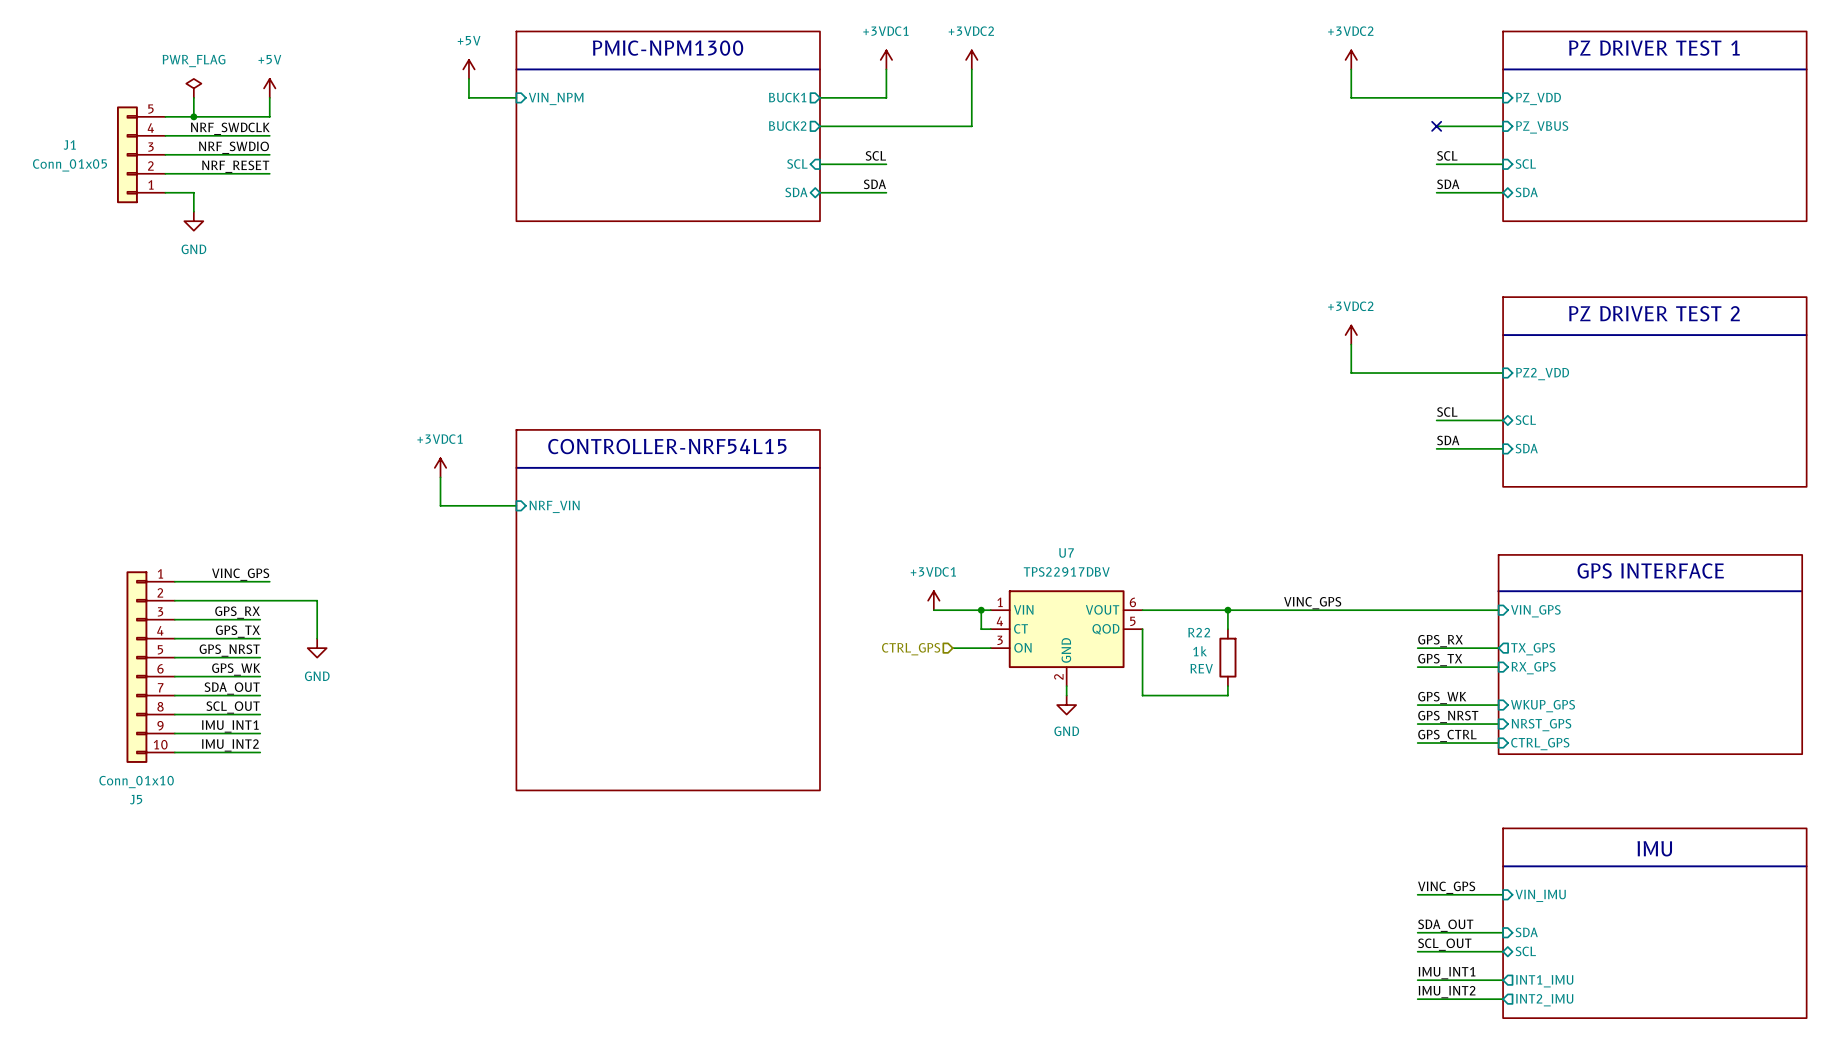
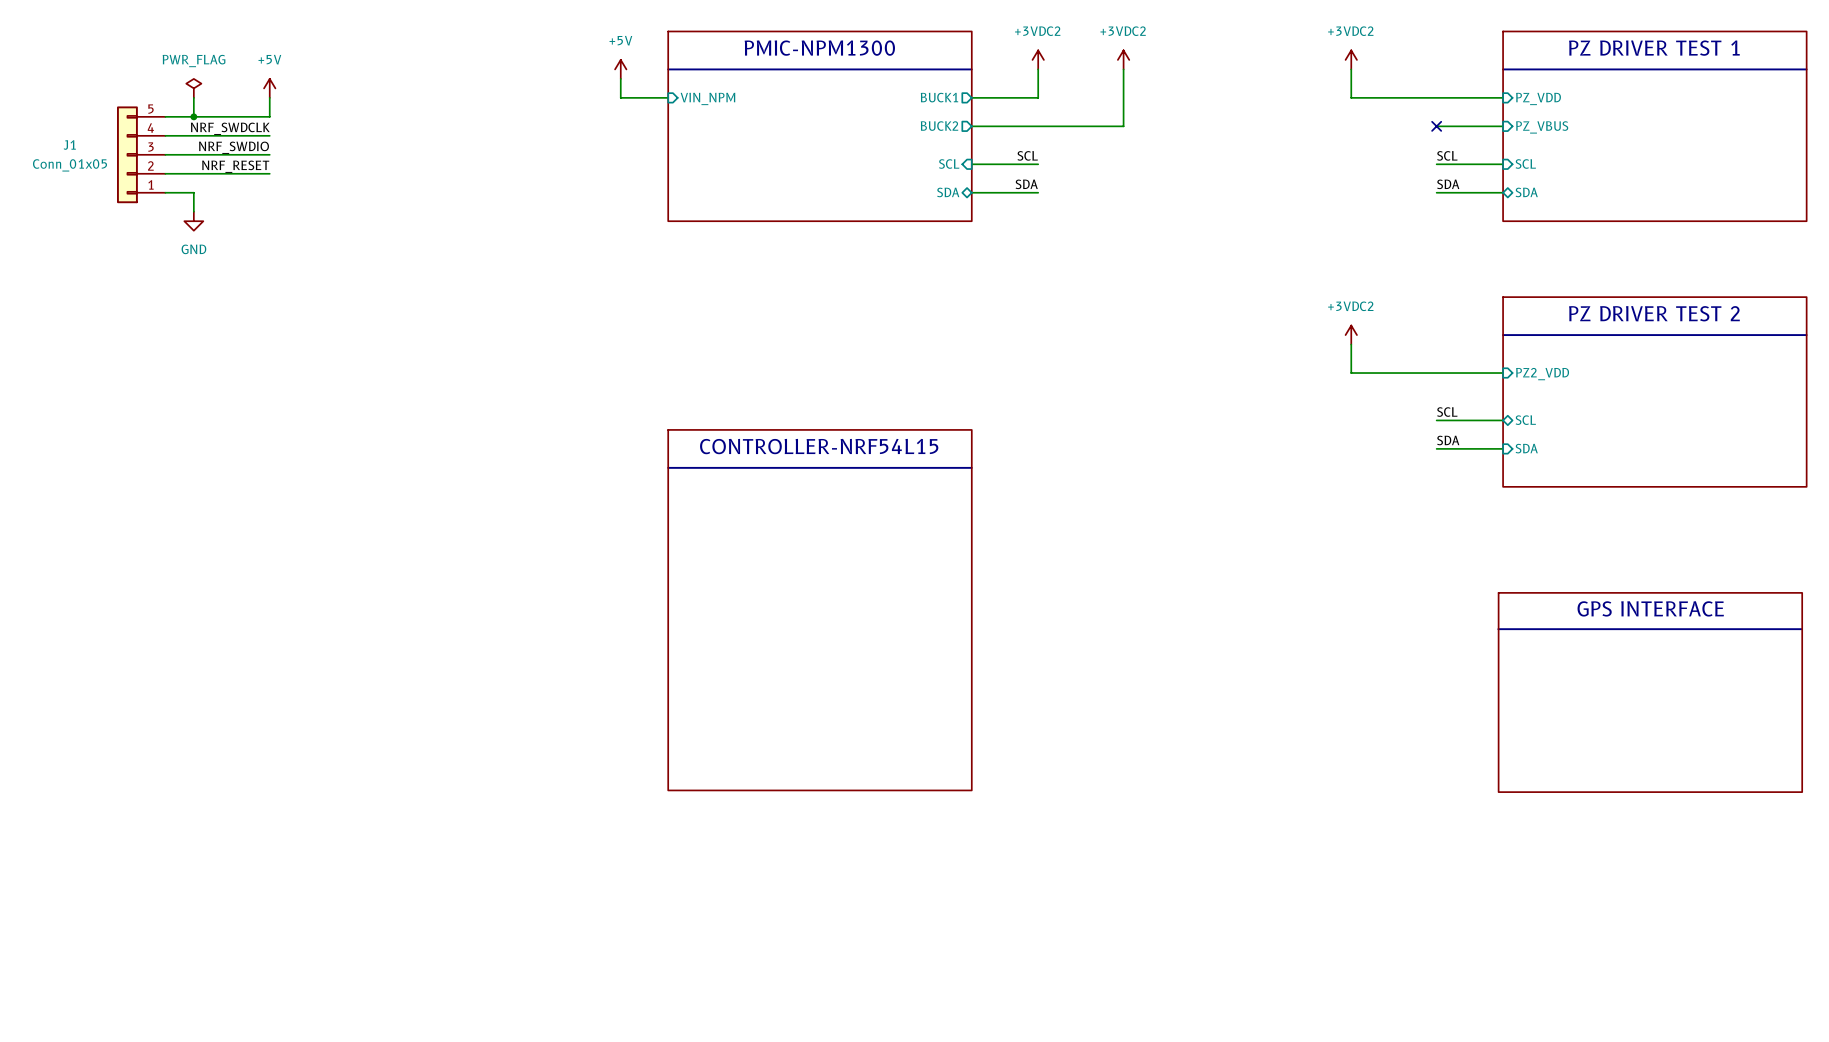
text position: PMIC-NPM1300 (668, 48) -> PMIC-NPM1300 (819, 48)
power symbol: +3VDC1 (886, 59) -> none
power symbol position: +3VDC2 (971, 59) -> +3VDC2 (1038, 59)
power symbol: none -> +3VDC2 (1123, 59)
power symbol position: +5V (468, 69) -> +5V (620, 69)
line: (516, 69) (668, 69) -> none
line: none -> (819, 69) (971, 69)
wire: (886, 69) (886, 97) (819, 97) -> (1038, 69) (1038, 97) (971, 97)
wire: (971, 69) (971, 126) (819, 126) -> (1123, 69) (1123, 126) (971, 126)
wire: (468, 78) (468, 97) (516, 97) -> (620, 78) (620, 97) (668, 97)
sheet pin position: BUCK1 (787, 97) -> BUCK1 (939, 97)
sheet pin position: VIN_NPM (556, 98) -> VIN_NPM (707, 98)
sheet position: (668, 126) -> (819, 126)
sheet pin position: BUCK2 (787, 126) -> BUCK2 (939, 126)
label position: SCL (875, 155) -> SCL (1027, 155)
sheet pin position: SCL (797, 163) -> SCL (949, 163)
wire: (819, 164) (886, 164) -> (971, 164) (1038, 164)
label position: SDA (874, 184) -> SDA (1026, 184)
sheet pin position: SDA (796, 192) -> SDA (948, 192)
wire: (819, 192) (886, 192) -> (971, 192) (1038, 192)
text position: CONTROLLER-NRF54L15 (667, 446) -> CONTROLLER-NRF54L15 (819, 446)
power symbol: +3VDC1 (440, 467) -> none
line: (516, 467) (668, 467) -> none
line: none -> (819, 467) (971, 467)
wire: (440, 477) (440, 505) (516, 505) -> none
sheet pin: NRF_VIN (554, 506) -> none
text position: GPS INTERFACE (1650, 570) -> GPS INTERFACE (1650, 608)
label: VINC_GPS (240, 574) -> none
wire: (174, 581) (269, 581) -> none
line: (1498, 591) (1801, 591) -> (1498, 629) (1801, 629)
wire: (174, 600) (317, 600) (317, 638) -> none
power symbol: +3VDC1 (933, 600) -> none
label: VINC_GPS (1312, 603) -> none
sheet position: (668, 610) -> (819, 610)
wire: (933, 610) (990, 610) -> none
wire: (981, 610) (981, 629) (990, 629) -> none
junction: (981, 610) -> none
wire: (1142, 610) (1498, 610) -> none
wire: (1227, 610) (1227, 629) -> none
junction: (1227, 610) -> none
sheet pin: VIN_GPS (1535, 611) -> none
label: GPS_RX (237, 612) -> none
wire: (174, 619) (260, 619) -> none
wire: (1142, 629) (1142, 695) (1227, 695) (1227, 686) -> none
label: GPS_TX (237, 631) -> none
wire: (174, 638) (260, 638) -> none
U7: TPS22917DBV (1066, 638) -> none
label: GPS_RX (1440, 641) -> none
power symbol: GND (317, 648) -> none
wire: (952, 648) (990, 648) -> none
wire: (1417, 648) (1498, 648) -> none
hierarchical label: CTRL_GPS (911, 649) -> none
sheet pin: TX_GPS (1533, 649) -> none
label: GPS_NRST (229, 650) -> none
sheet position: (1650, 654) -> (1650, 692)
wire: (174, 657) (260, 657) -> none
R22: 1k (1227, 657) -> none
label: GPS_TX (1440, 660) -> none
J5: Conn_01x10 (150, 667) -> none
wire: (1417, 667) (1498, 667) -> none
sheet pin: RX_GPS (1533, 668) -> none
label: GPS_WK (236, 669) -> none
wire: (174, 676) (260, 676) -> none
wire: (1066, 686) (1066, 695) -> none
label: SDA_OUT (232, 688) -> none
wire: (174, 695) (260, 695) -> none
label: GPS_WK (1442, 698) -> none
power symbol: GND (1066, 705) -> none
wire: (1417, 705) (1498, 705) -> none
sheet pin: WKUP_GPS (1543, 706) -> none
label: SCL_OUT (233, 707) -> none
wire: (174, 714) (260, 714) -> none
label: GPS_NRST (1448, 716) -> none
wire: (1417, 724) (1498, 724) -> none
sheet pin: NRST_GPS (1541, 725) -> none
label: IMU_INT1 (230, 726) -> none
wire: (174, 733) (260, 733) -> none
label: GPS_CTRL (1447, 735) -> none
wire: (1417, 743) (1498, 743) -> none
sheet pin: CTRL_GPS (1540, 744) -> none
label: IMU_INT2 (230, 745) -> none
wire: (174, 752) (260, 752) -> none
text: IMU (1654, 848) -> none
line: (1503, 866) (1806, 866) -> none
label: VINC_GPS (1446, 887) -> none
wire: (1417, 894) (1503, 894) -> none
sheet pin: VIN_IMU (1540, 895) -> none
sheet: (1654, 923) -> none
label: SDA_OUT (1445, 925) -> none
wire: (1417, 932) (1503, 932) -> none
sheet pin: SDA (1526, 932) -> none
label: SCL_OUT (1444, 944) -> none
wire: (1417, 951) (1503, 951) -> none
sheet pin: SCL (1525, 951) -> none
label: IMU_INT1 (1447, 973) -> none
wire: (1417, 980) (1503, 980) -> none
sheet pin: INT1_IMU (1544, 981) -> none
label: IMU_INT2 (1447, 992) -> none
wire: (1417, 999) (1503, 999) -> none
sheet pin: INT2_IMU (1544, 1000) -> none

